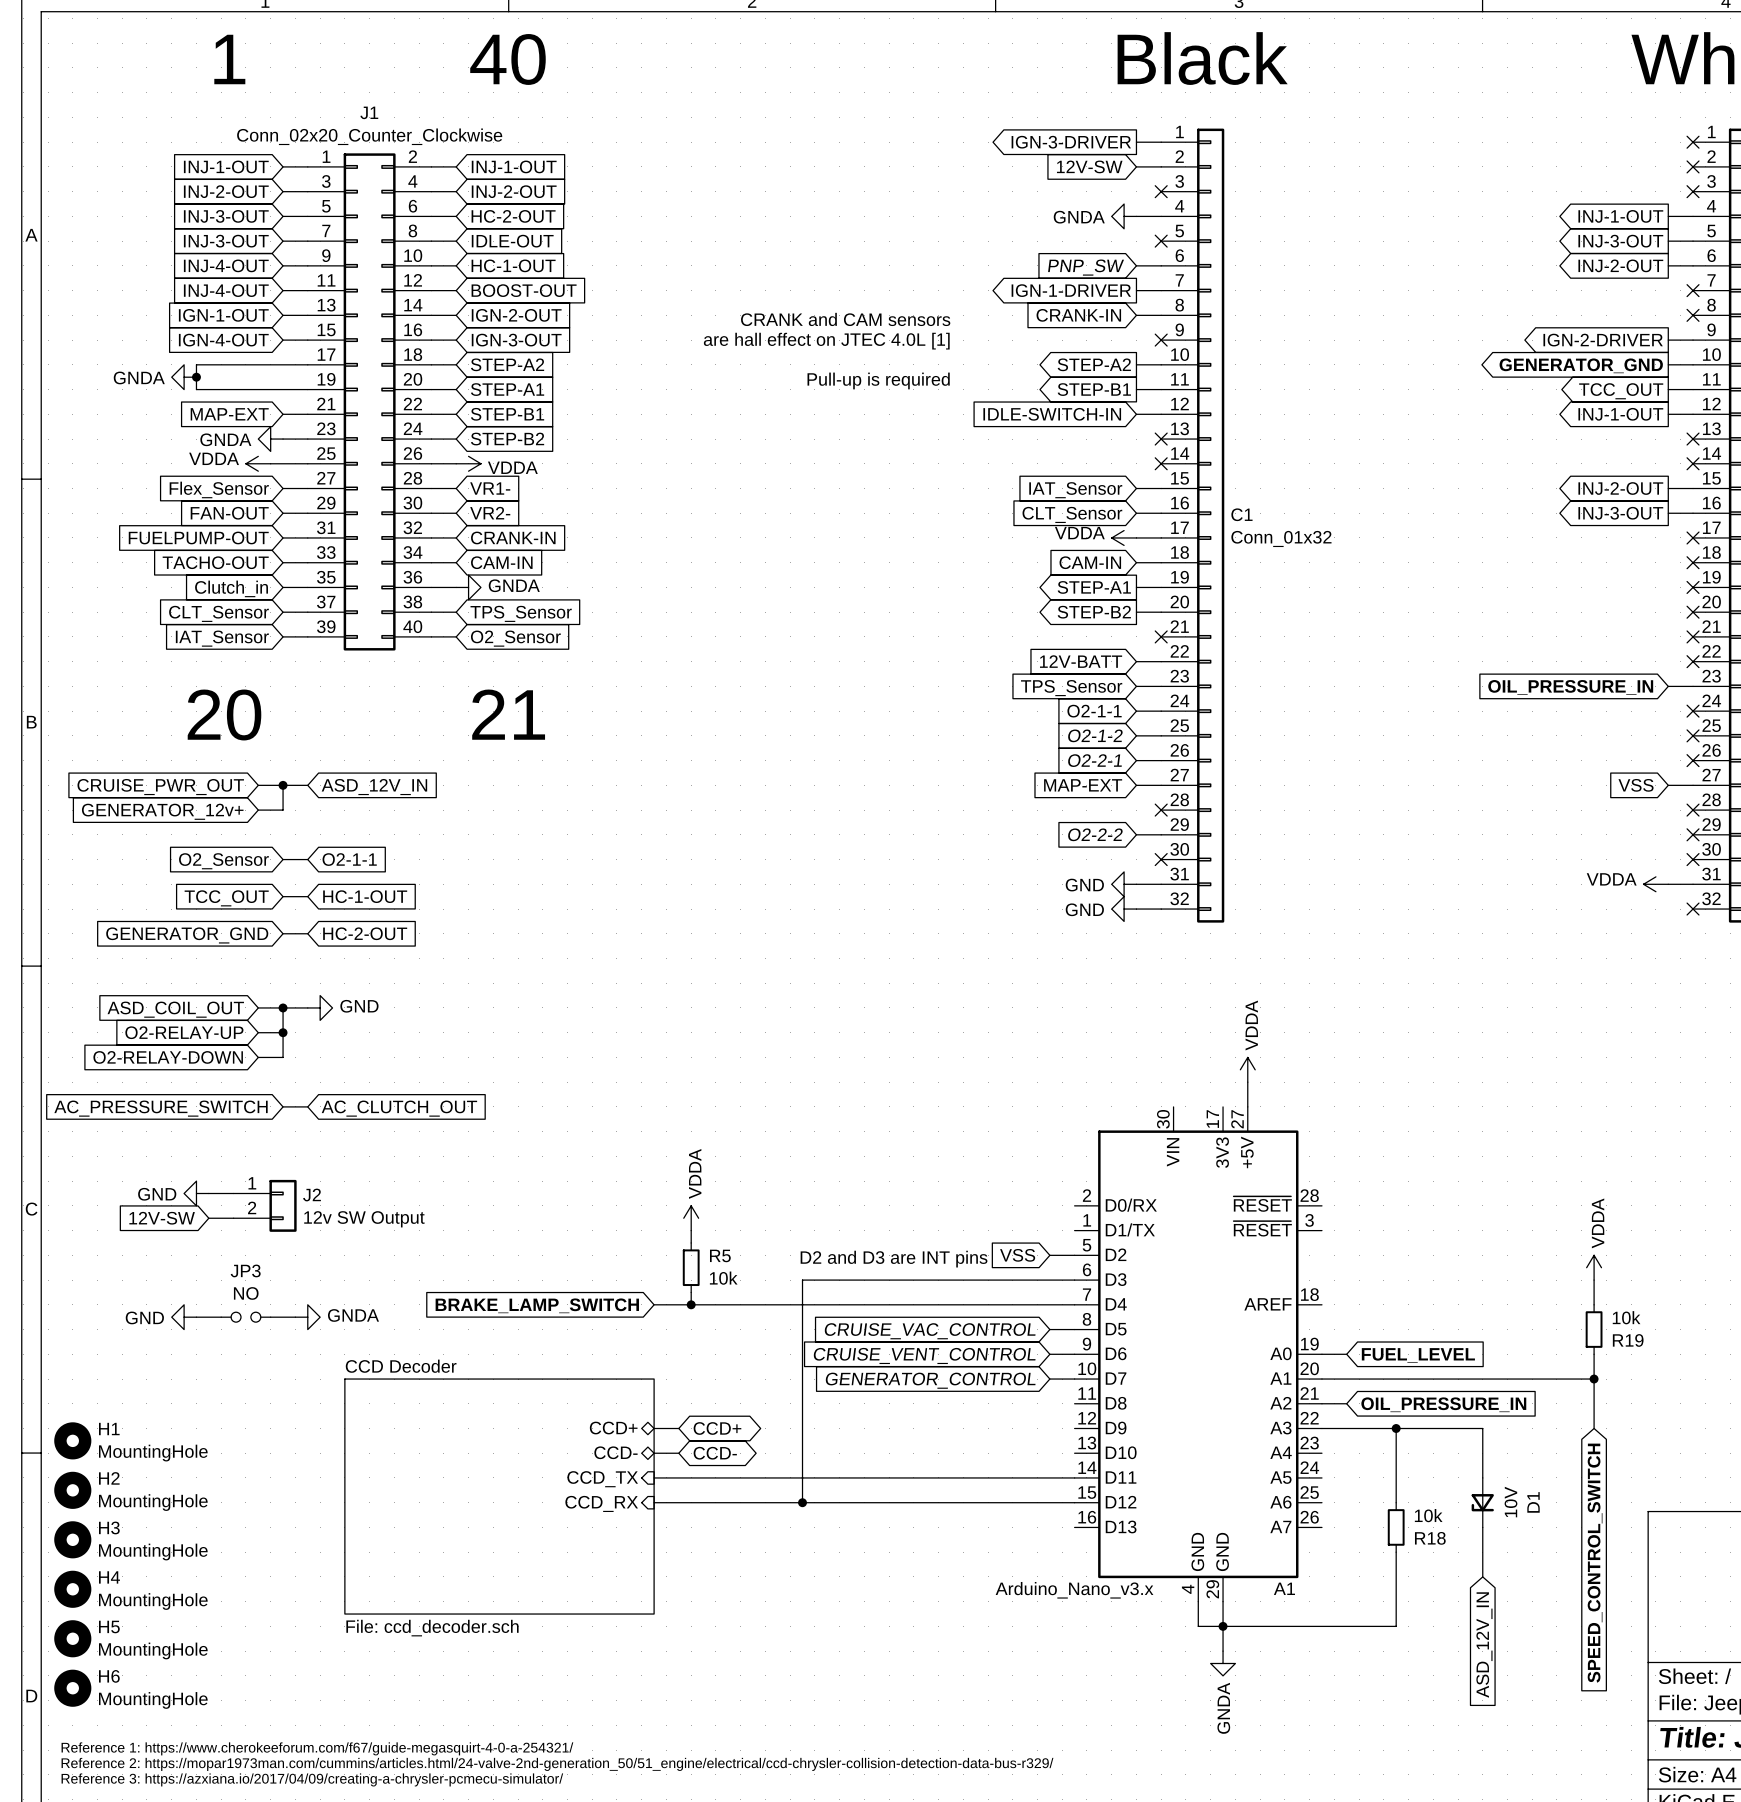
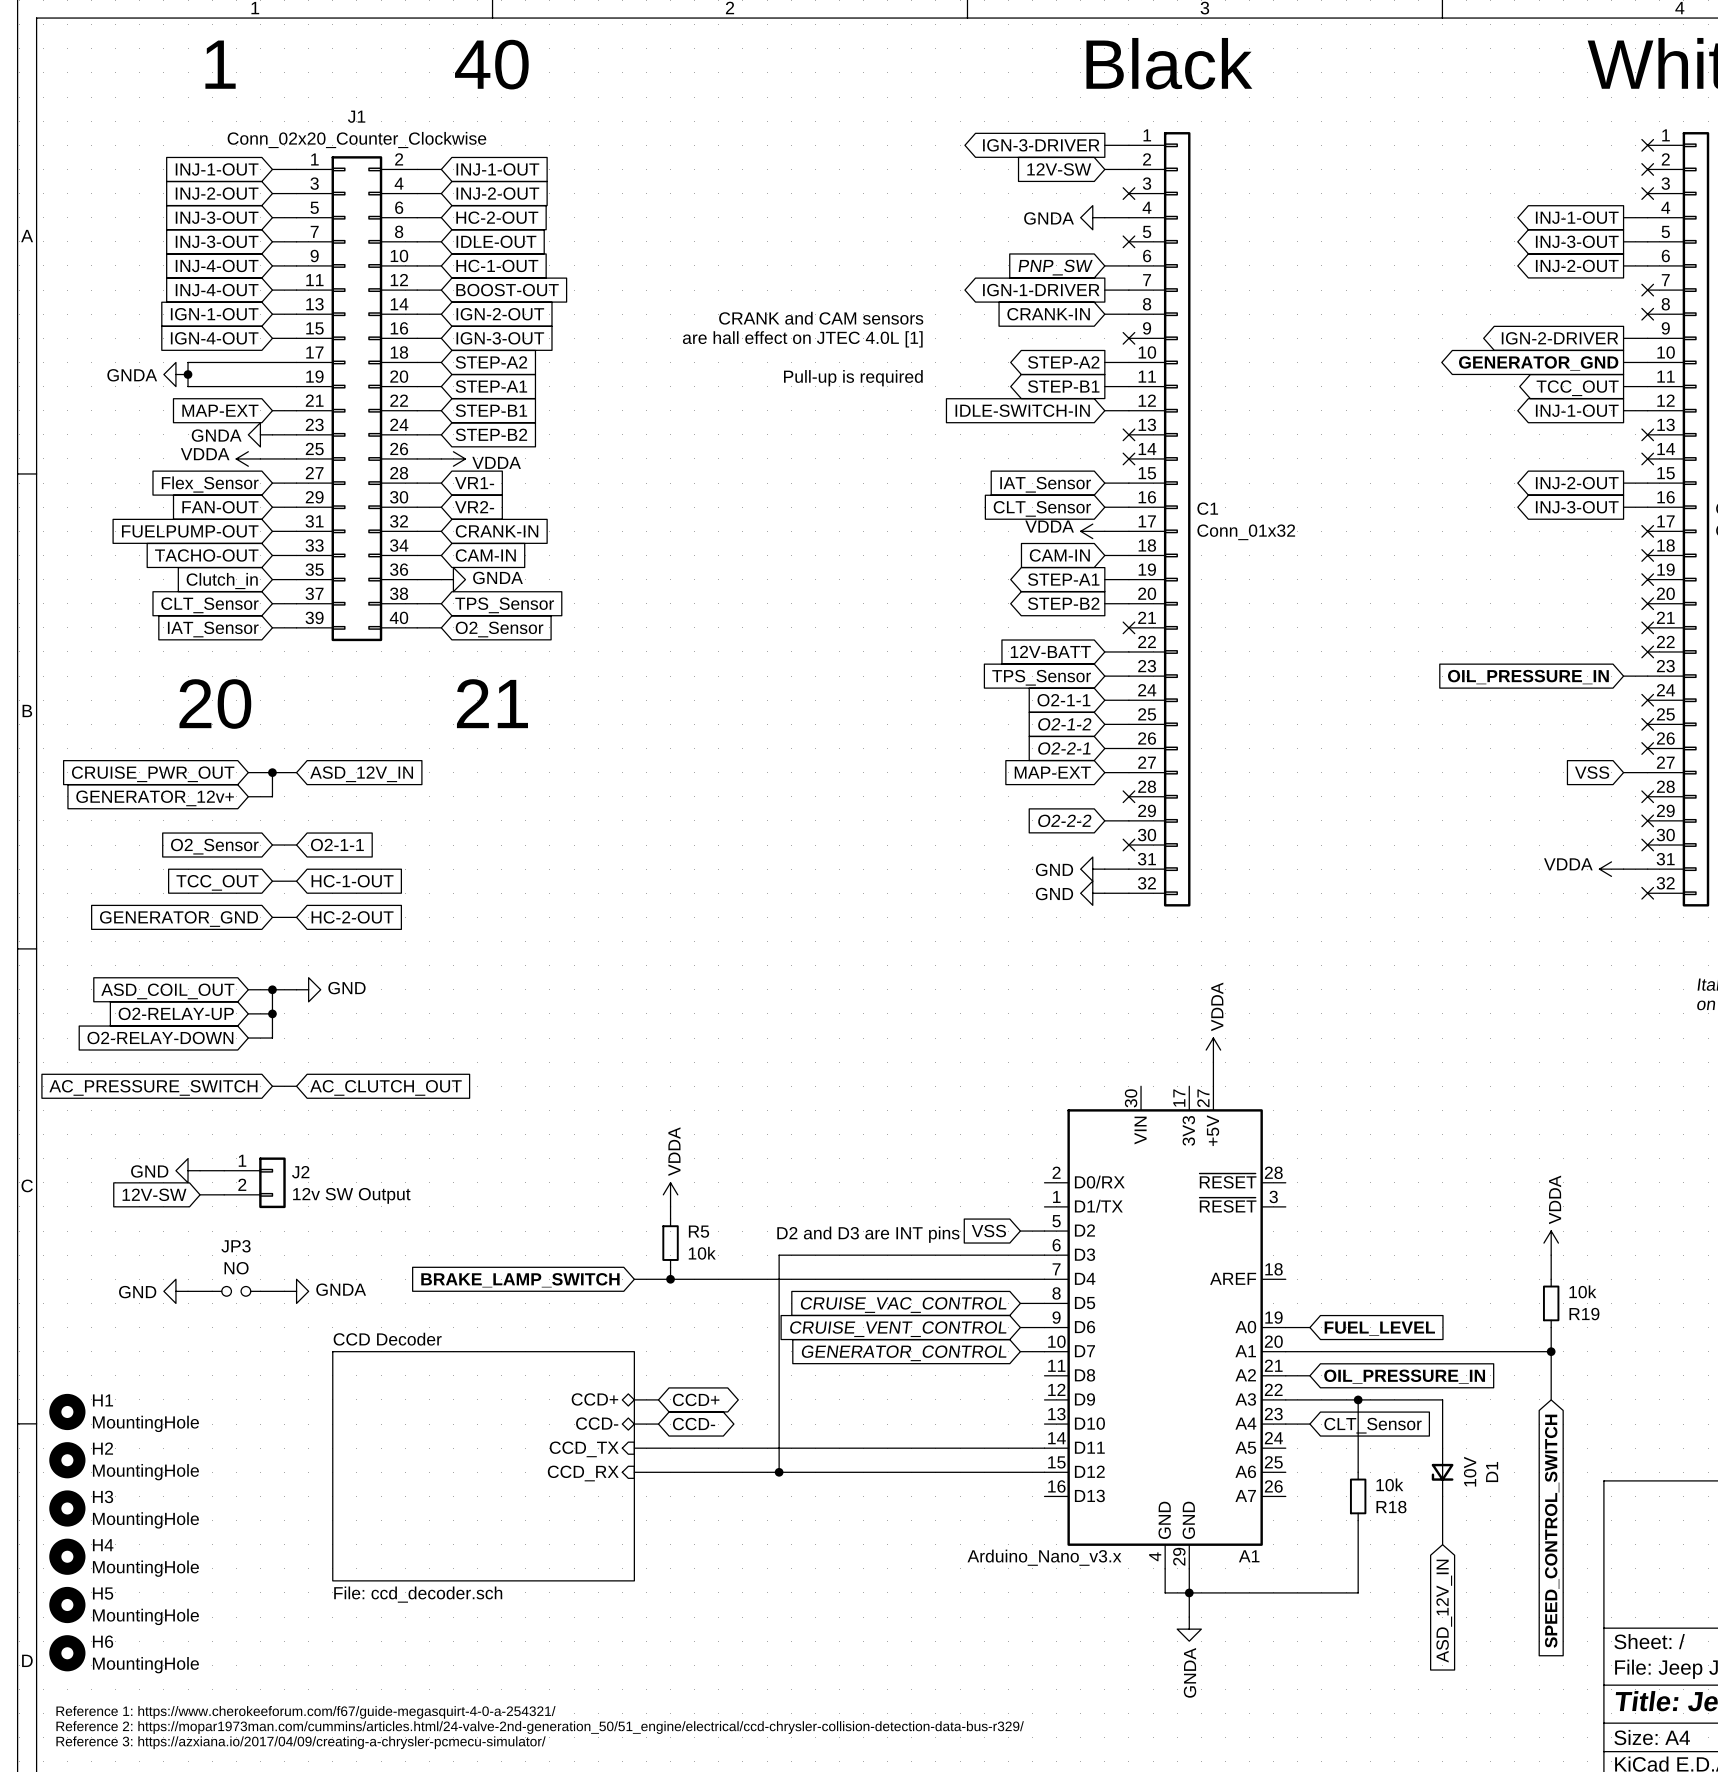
wire: none -> (1285, 1424) (1309, 1424)
global label: none -> CLT_Sensor (1373, 1425)

